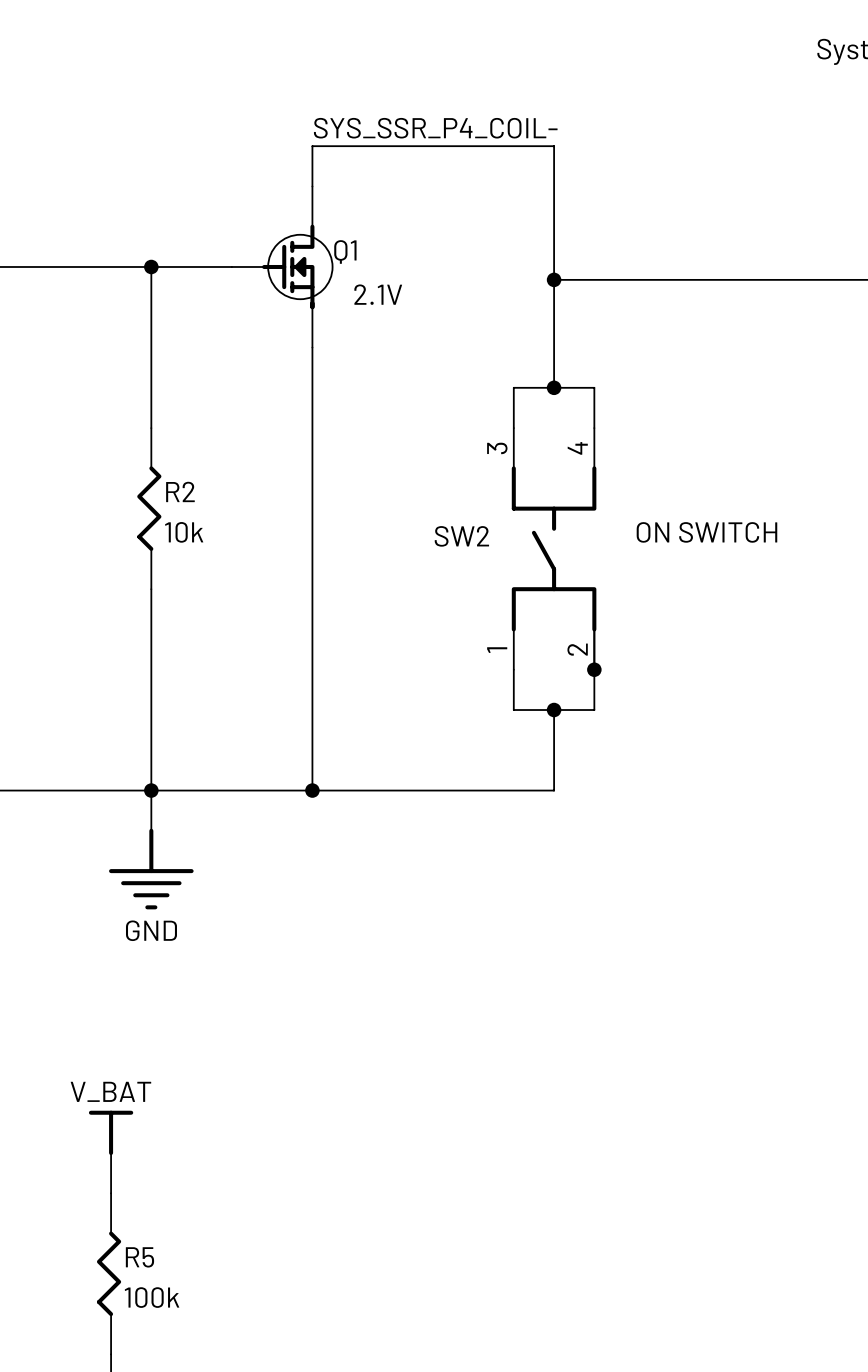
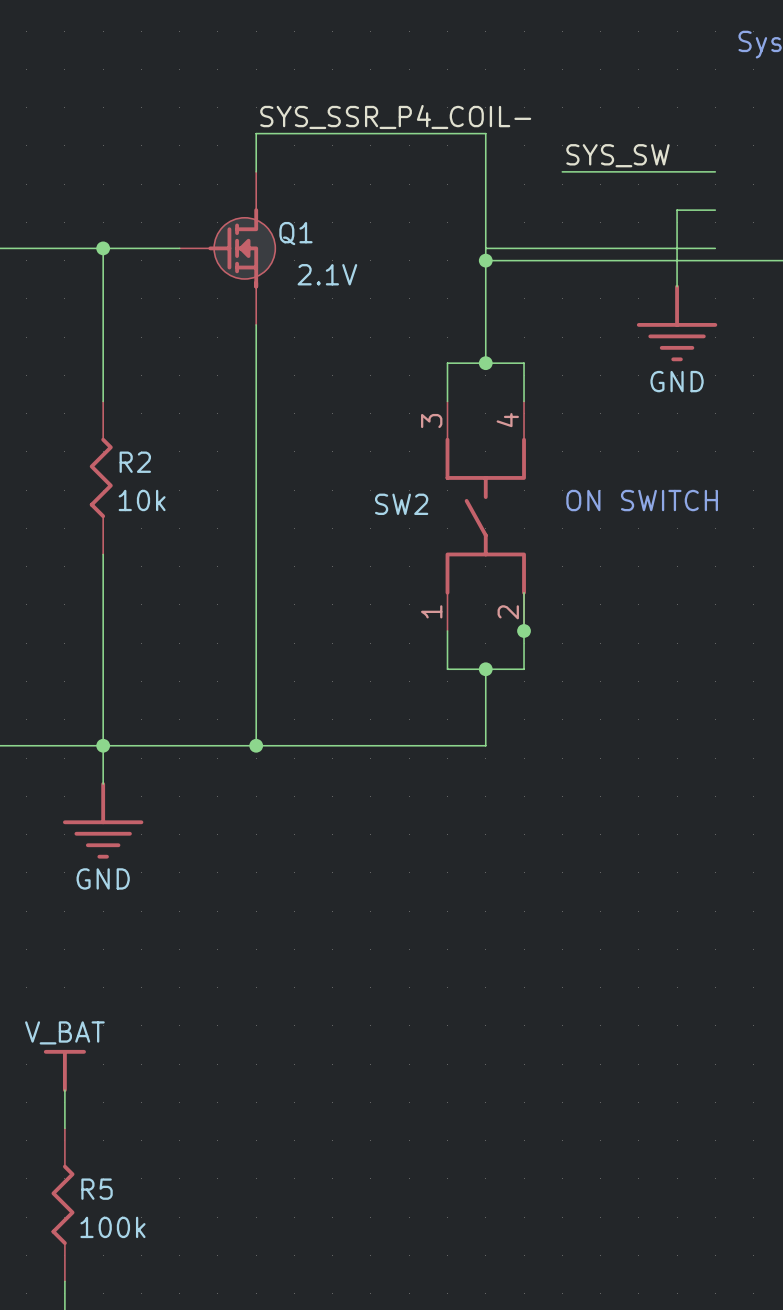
label: none -> SYS_SW (617, 155)
wire: none -> (562, 171) (715, 171)
wire: none -> (715, 210) (677, 210) (677, 286)
wire: none -> (485, 248) (715, 248)
power symbol: none -> GND (677, 322)

